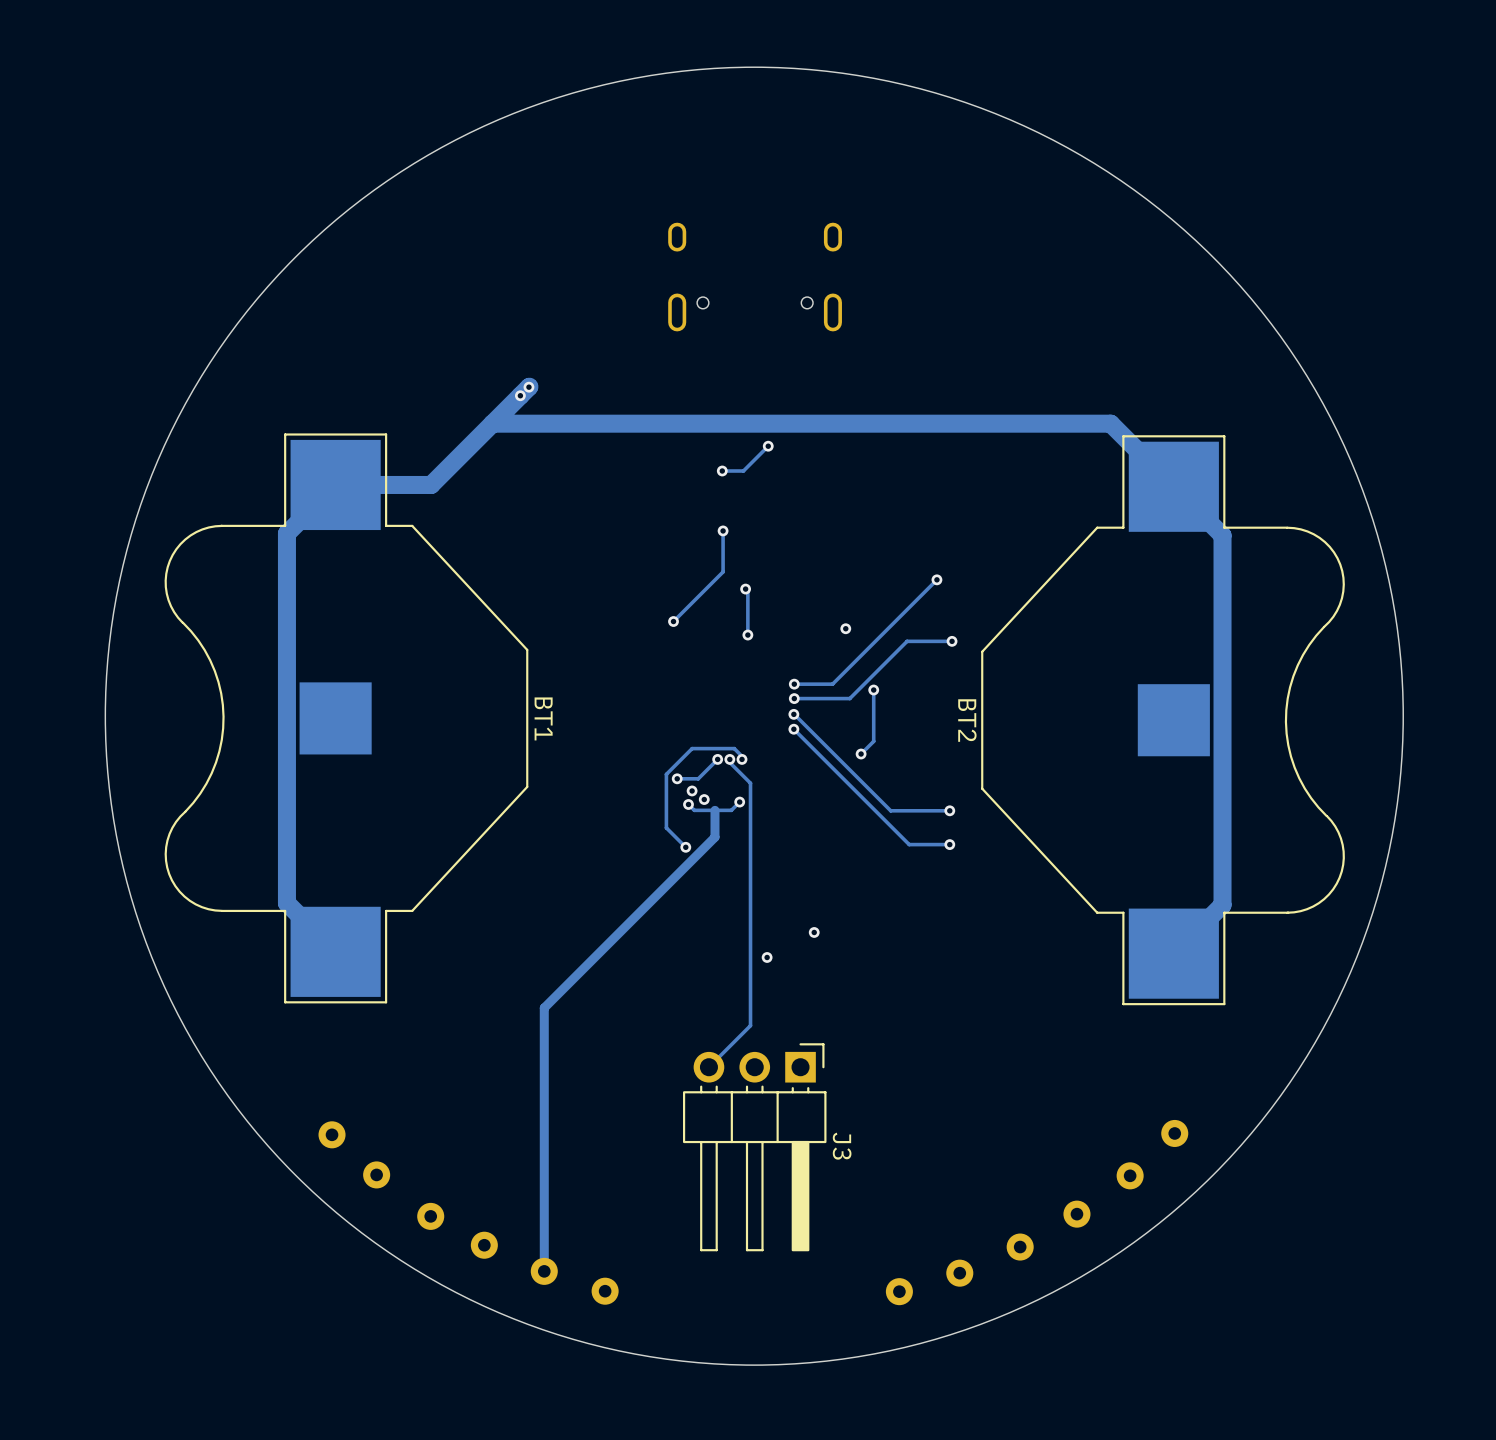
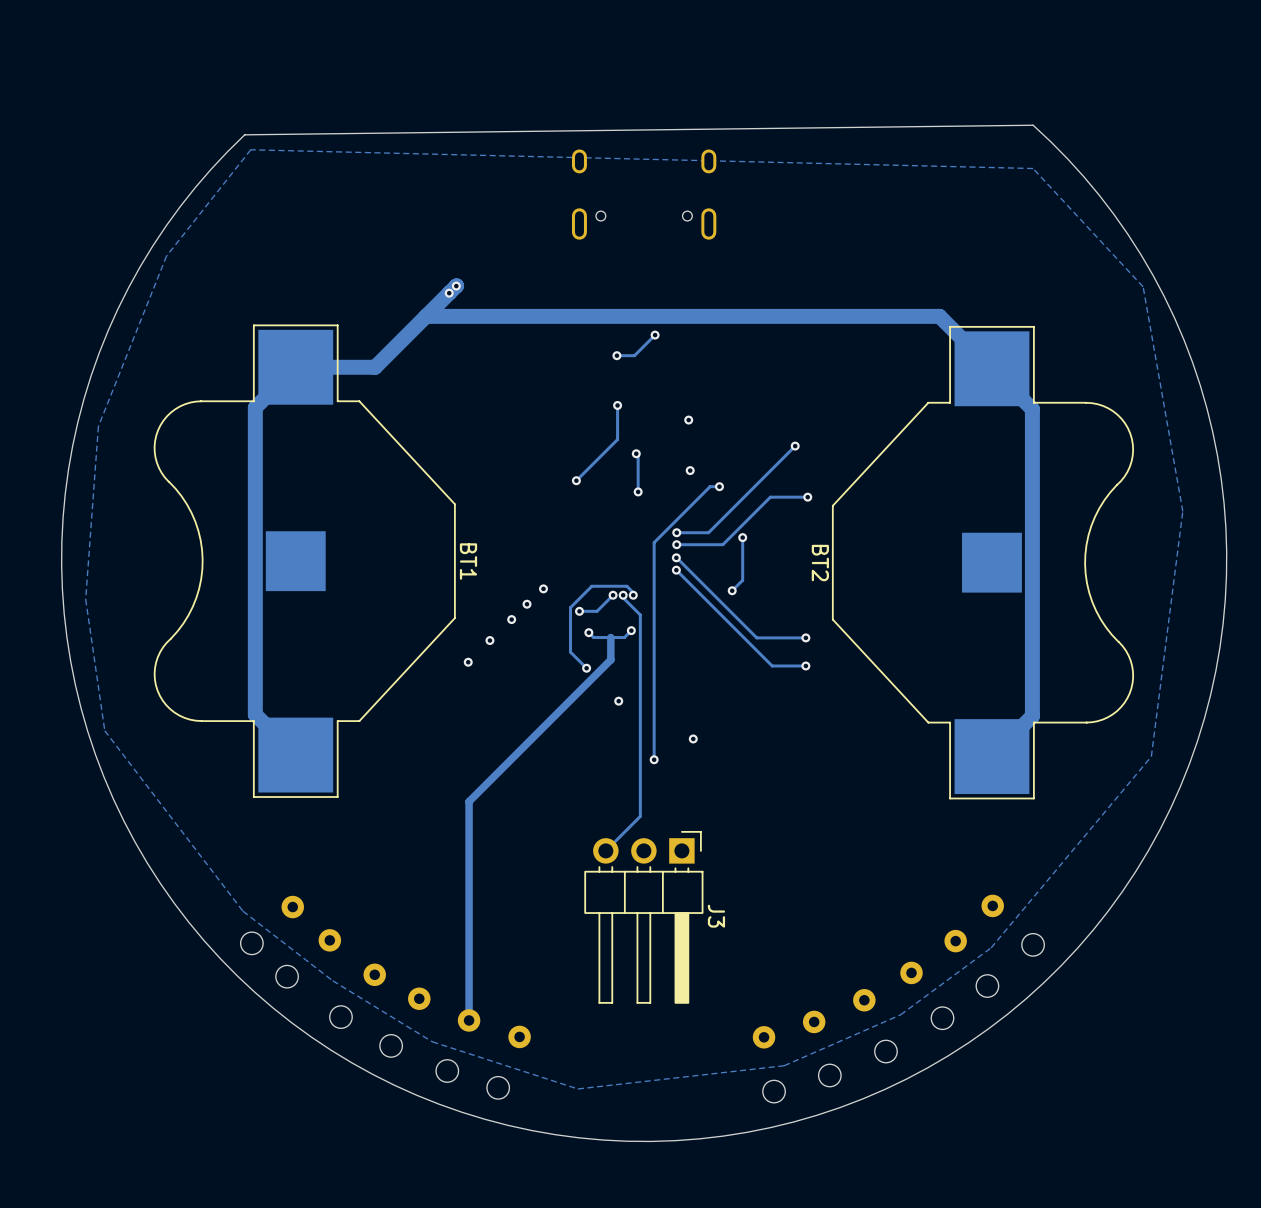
round board edge: [104, 66, 1404, 1366] -> none
board edge: none -> (1033, 125) (244, 134) (211, 169) (166, 225) (140, 266) (117, 309) (91, 376) (77, 422) (65, 493) (61, 541) (62, 589) (66, 637) (75, 685) (87, 731) (113, 799) (147, 863) (174, 903) (220, 958) (254, 992) (311, 1037) (351, 1062) (416, 1095) (461, 1112) (507, 1125) (579, 1137) (627, 1141) (675, 1140) (747, 1132) (794, 1121) (862, 1098) (906, 1079) (948, 1055) (988, 1028) (1026, 998) (1077, 948) (1108, 910) (1135, 871) (1159, 829) (1189, 763) (1204, 718) (1219, 647) (1225, 599) (1225, 527) (1221, 479) (1207, 408) (1192, 362) (1164, 296) (1140, 254) (1099, 195) (1067, 158) (1033, 125)
zone outline: none -> (250, 149) (166, 256) (98, 426) (85, 599) (104, 730) (242, 911) (332, 980) (432, 1041) (577, 1088) (784, 1065) (900, 1014) (991, 947) (1151, 756) (1182, 511) (1143, 286) (1033, 168) (250, 149)
via: none -> (688, 420)
via: none -> (690, 470)
track: none -> (719, 486) (710, 486) (654, 542) (654, 759)
via: none -> (543, 588)
via: none -> (527, 604)
via: none -> (511, 619)
via: (692, 790) -> none
via: (704, 799) -> none
via: none -> (489, 640)
via: none -> (468, 662)
via: none -> (618, 701)
round board edge: none -> [240, 931, 264, 955]
round board edge: none -> [1021, 933, 1045, 957]
round board edge: none -> [275, 965, 299, 989]
round board edge: none -> [975, 974, 1000, 998]
round board edge: none -> [329, 1005, 353, 1029]
round board edge: none -> [930, 1006, 955, 1030]
round board edge: none -> [379, 1034, 403, 1058]
round board edge: none -> [874, 1039, 898, 1064]
round board edge: none -> [435, 1059, 459, 1083]
round board edge: none -> [818, 1063, 842, 1088]
round board edge: none -> [486, 1076, 510, 1100]
round board edge: none -> [762, 1079, 786, 1104]

